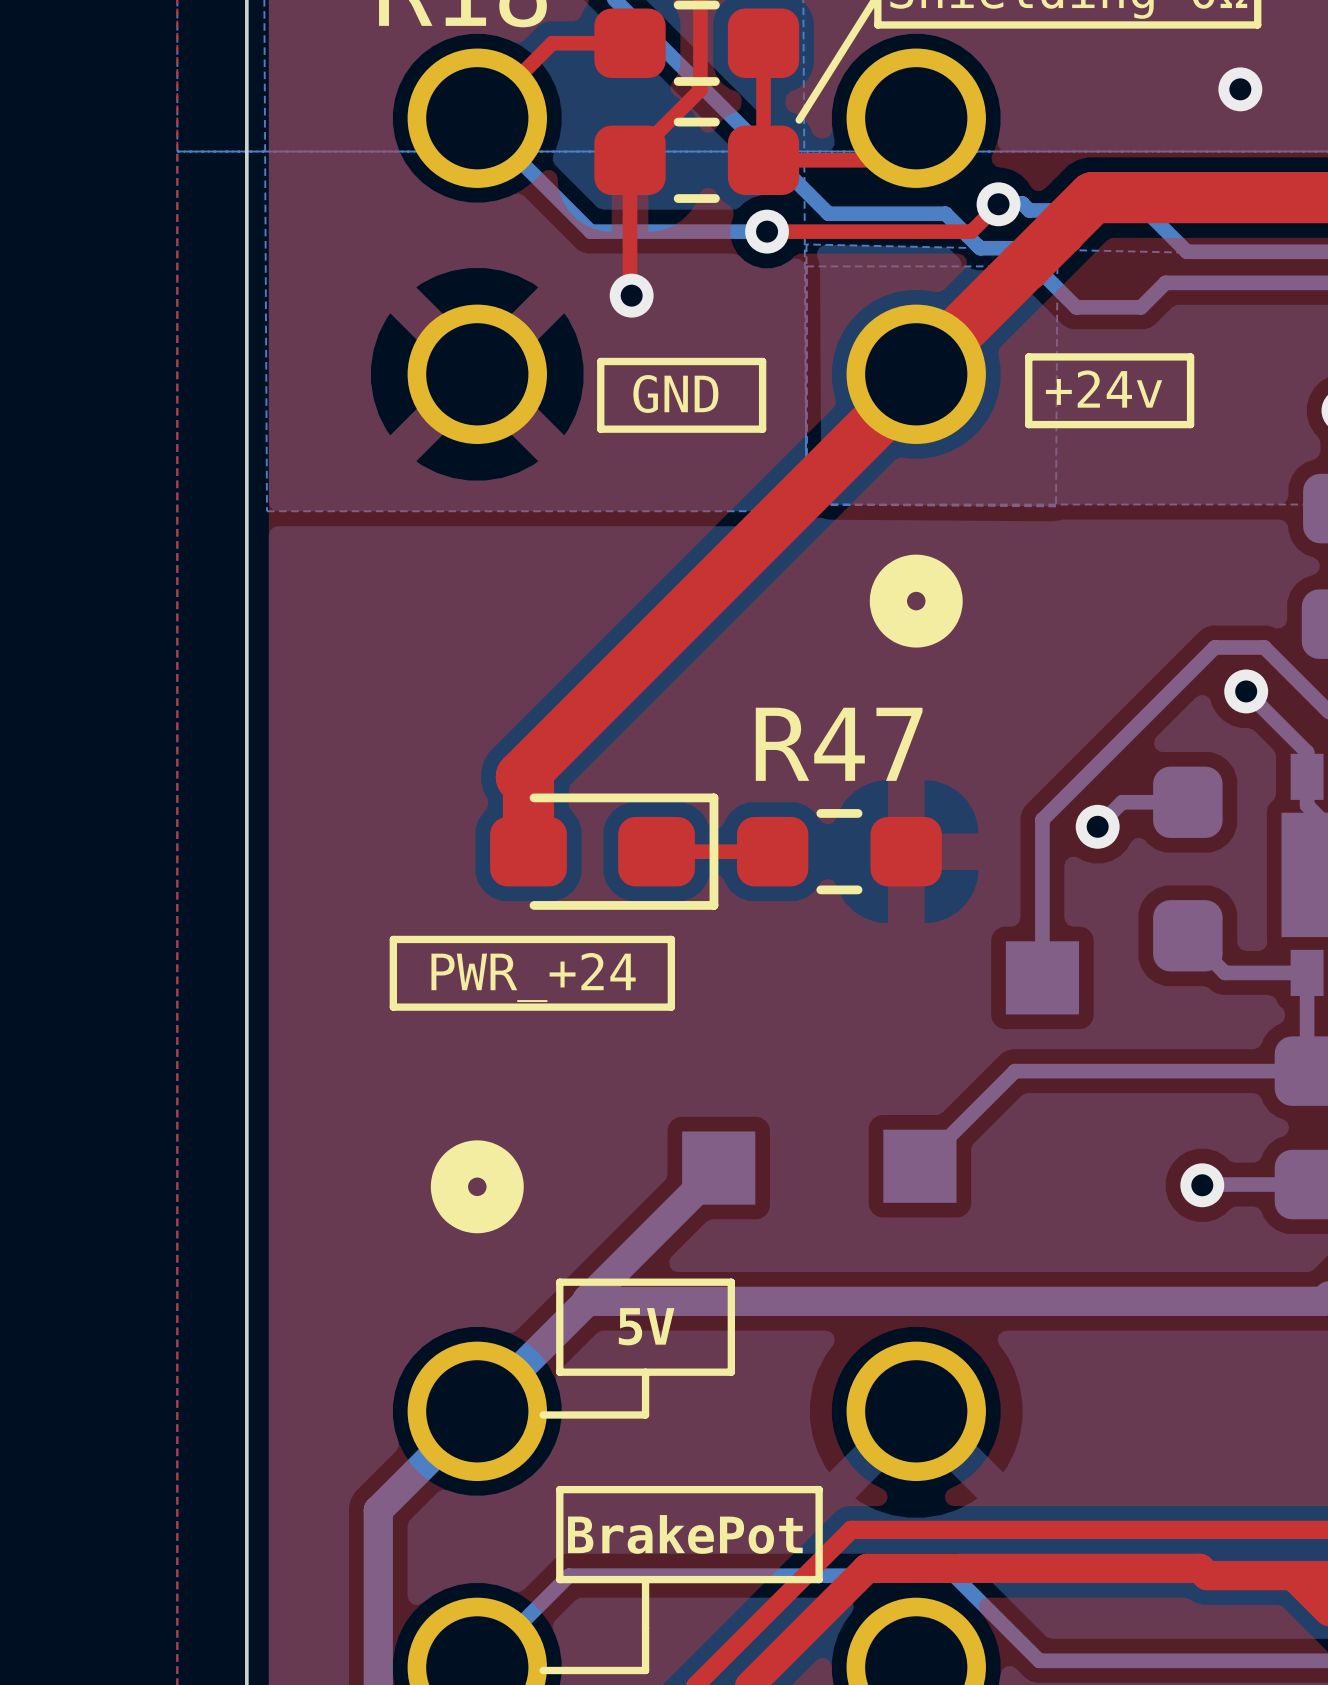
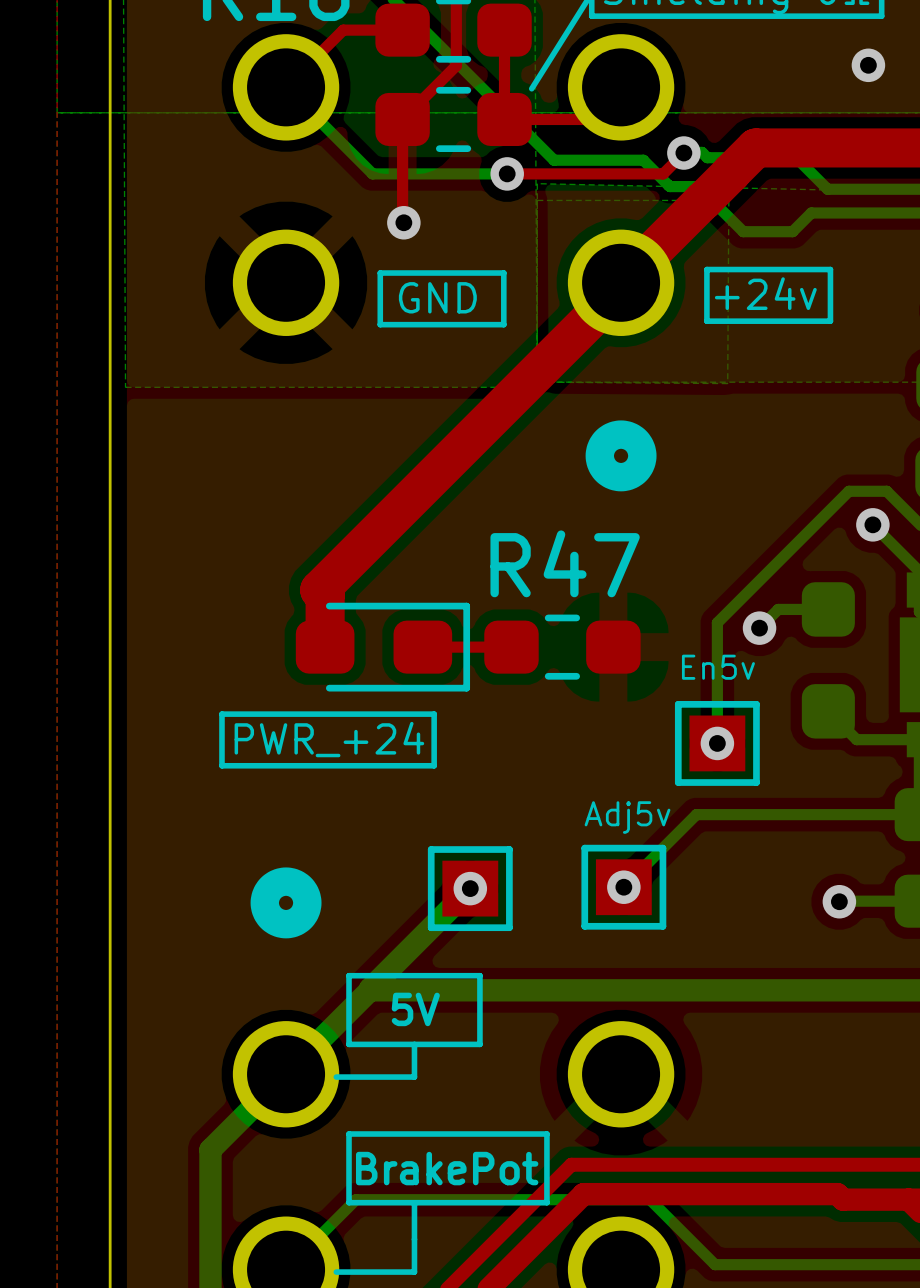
En5v side: bottom (1042, 977) -> top (717, 743)
via: none -> (717, 743)
Adj5v side: bottom (919, 1166) -> top (623, 887)
via: none -> (623, 887)
part side: bottom (718, 1168) -> top (470, 888)
via: none -> (470, 888)

